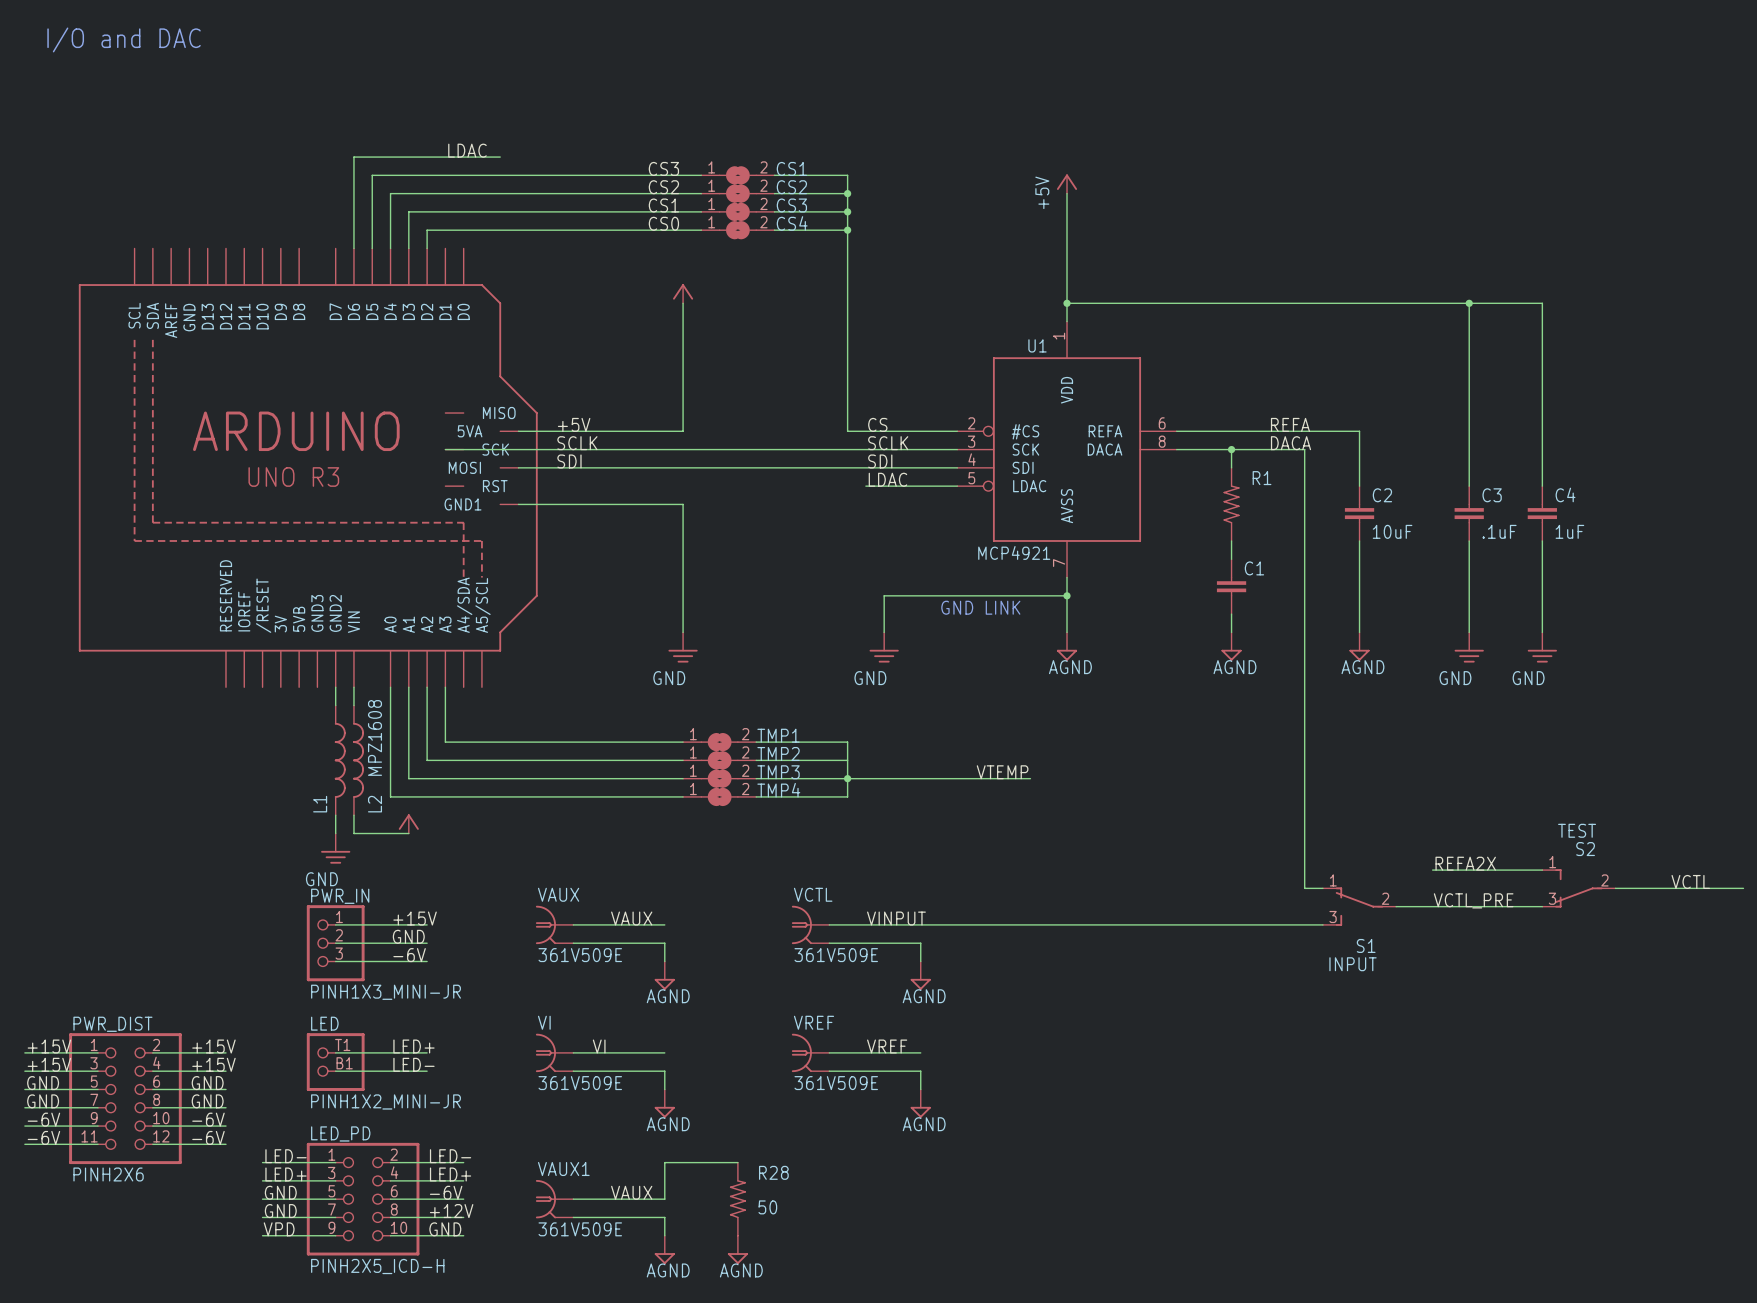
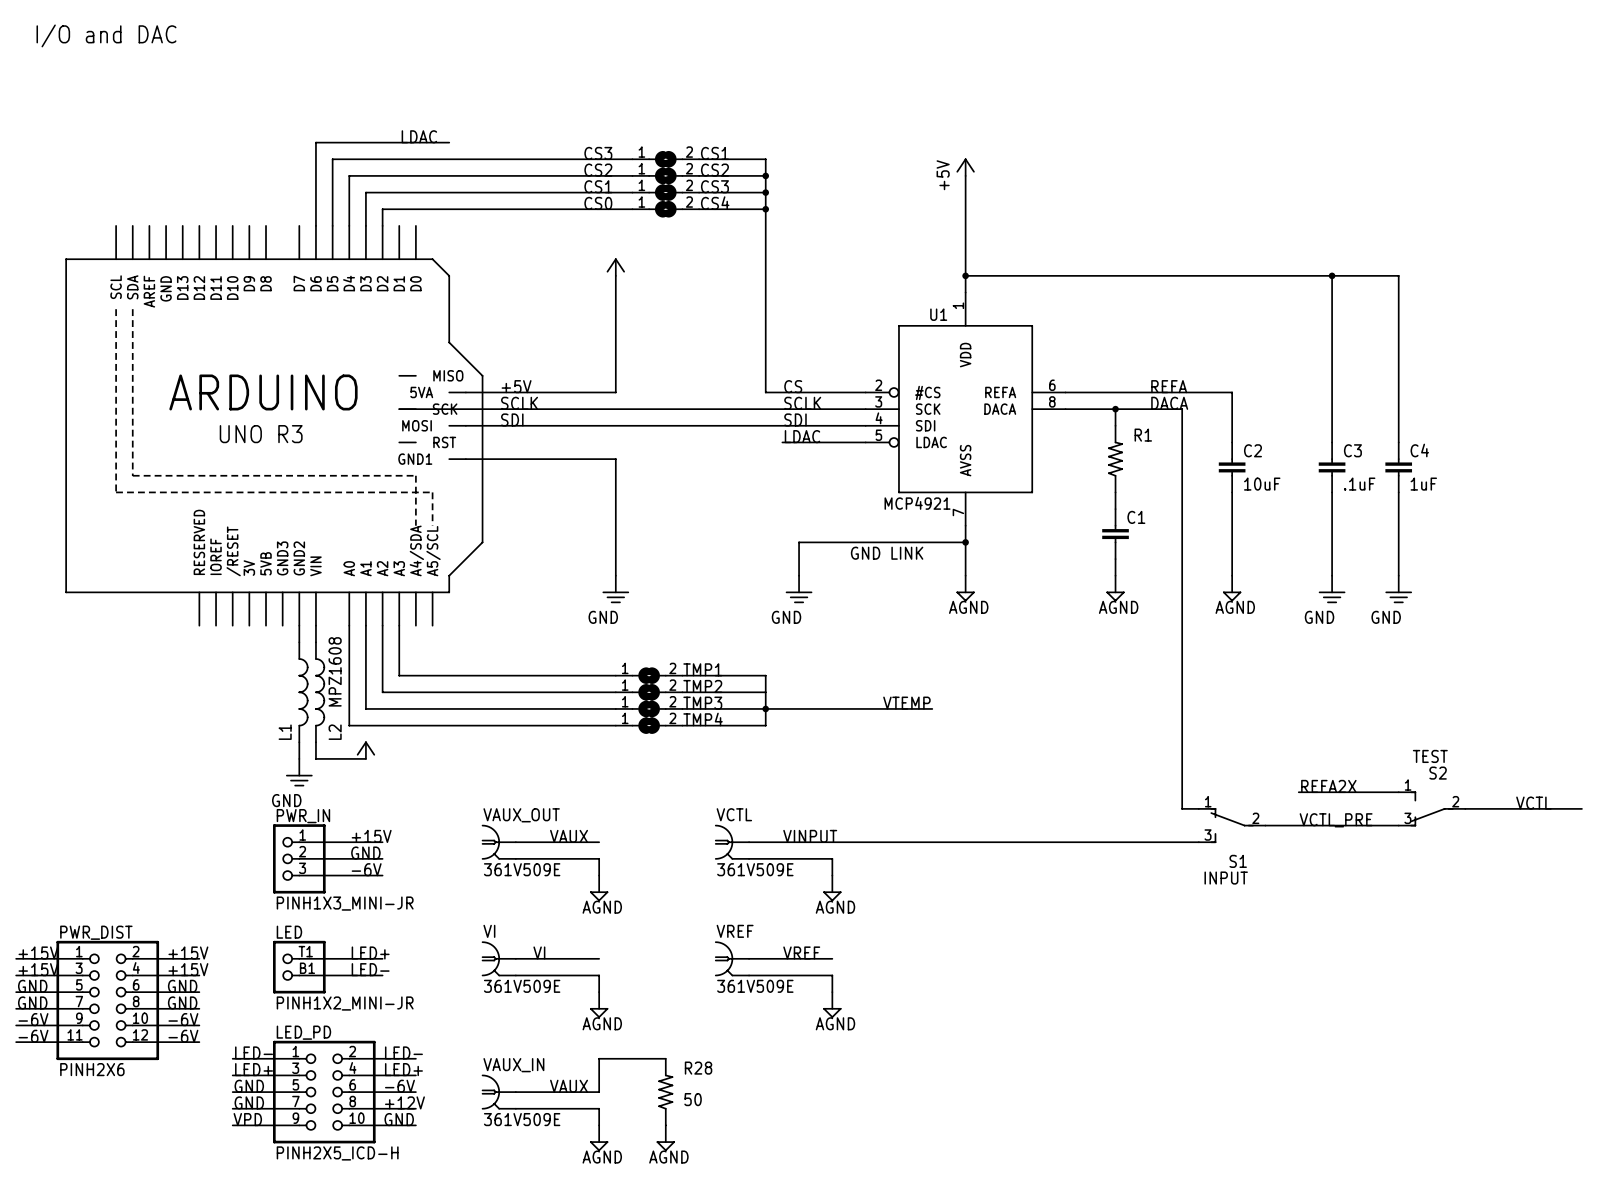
VAUX name: VAUX (558, 894) -> VAUX_OUT (521, 815)
VAUX1 name: VAUX1 (563, 1169) -> VAUX_IN (513, 1065)

